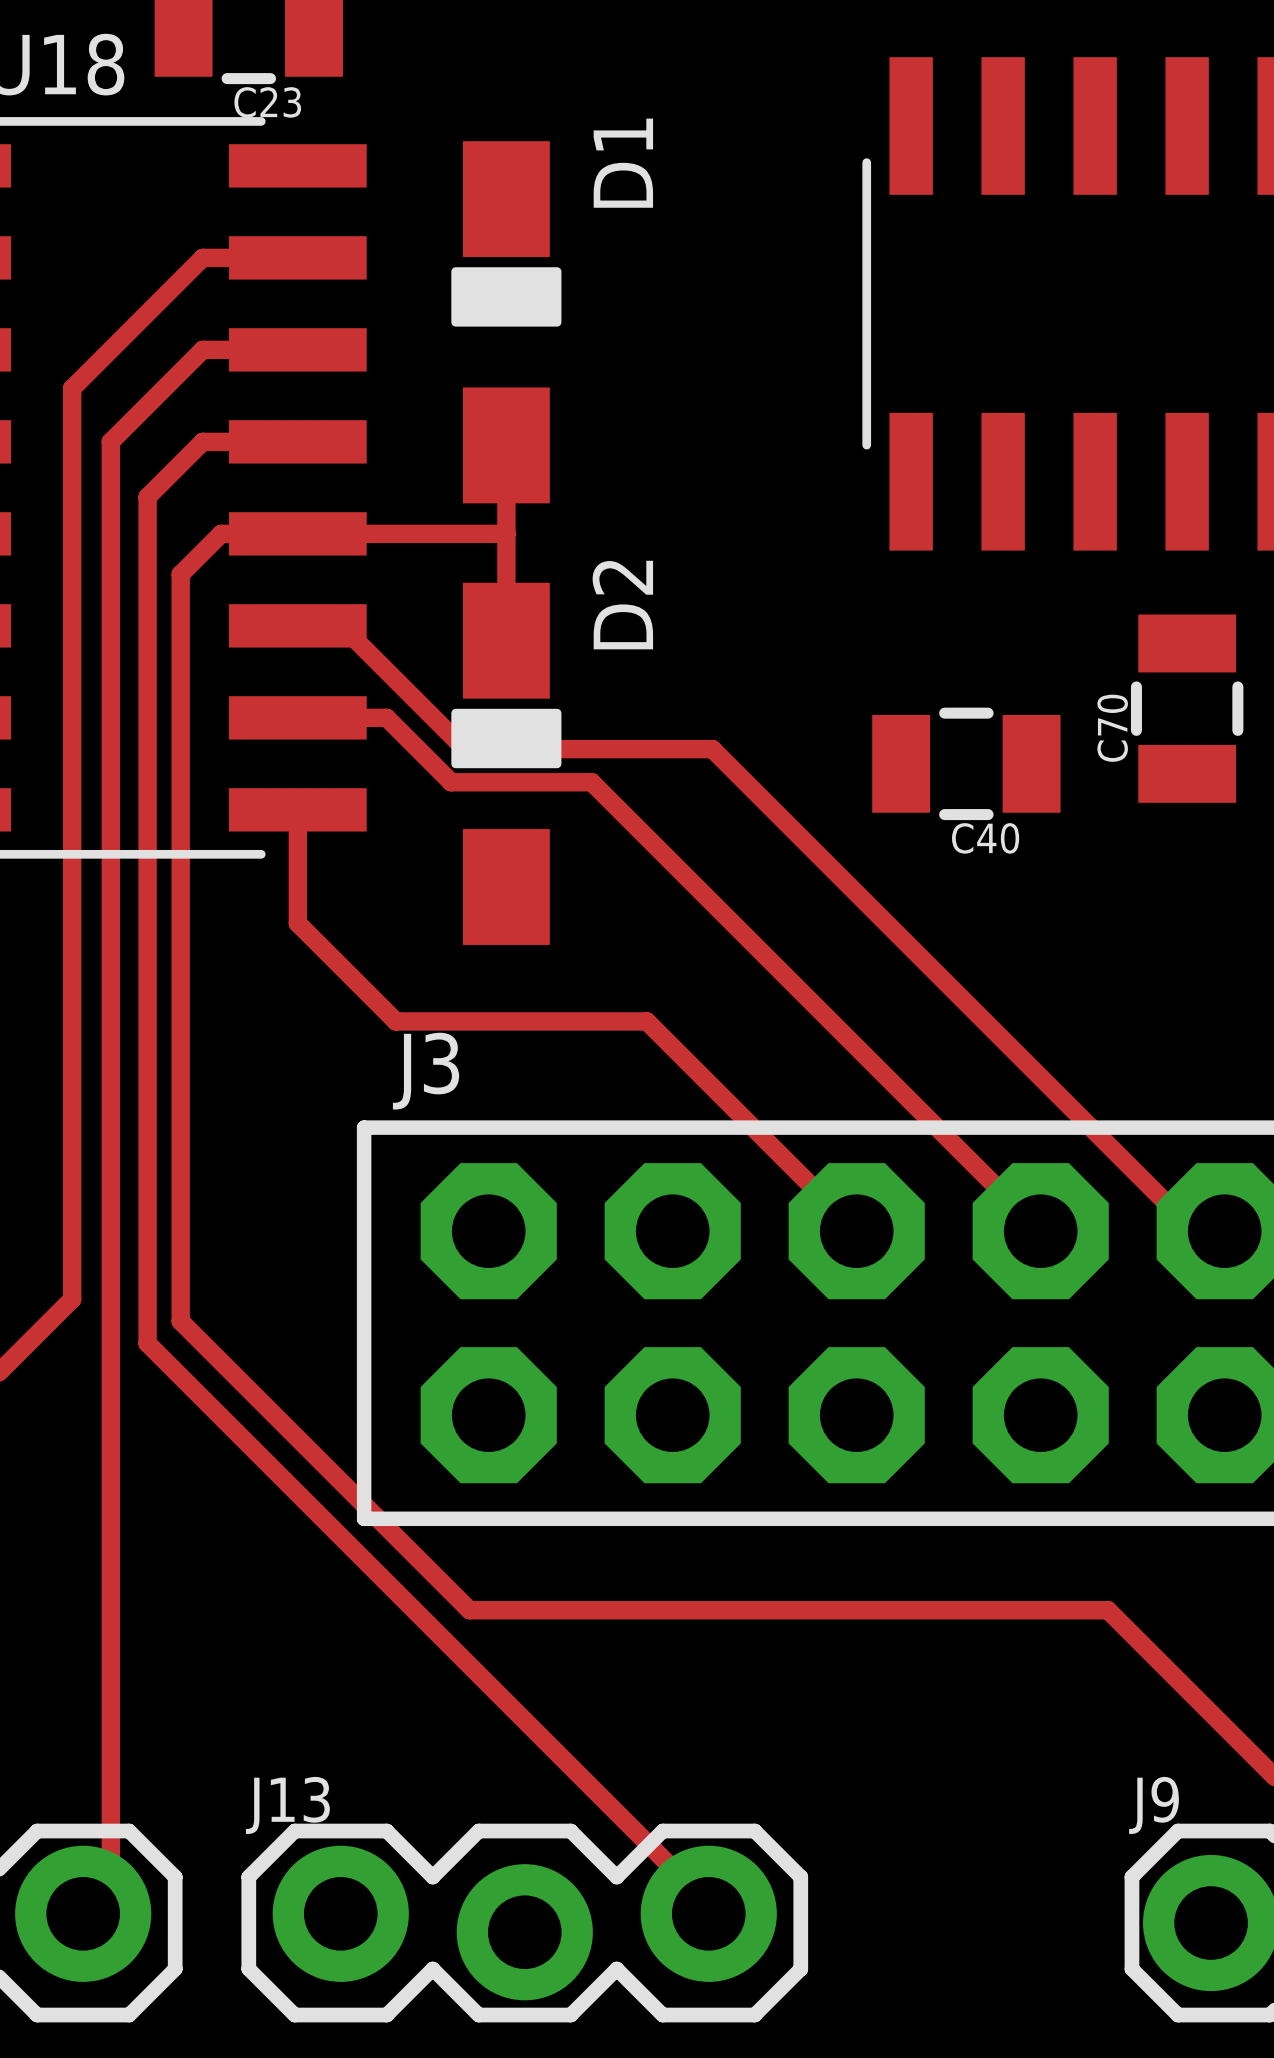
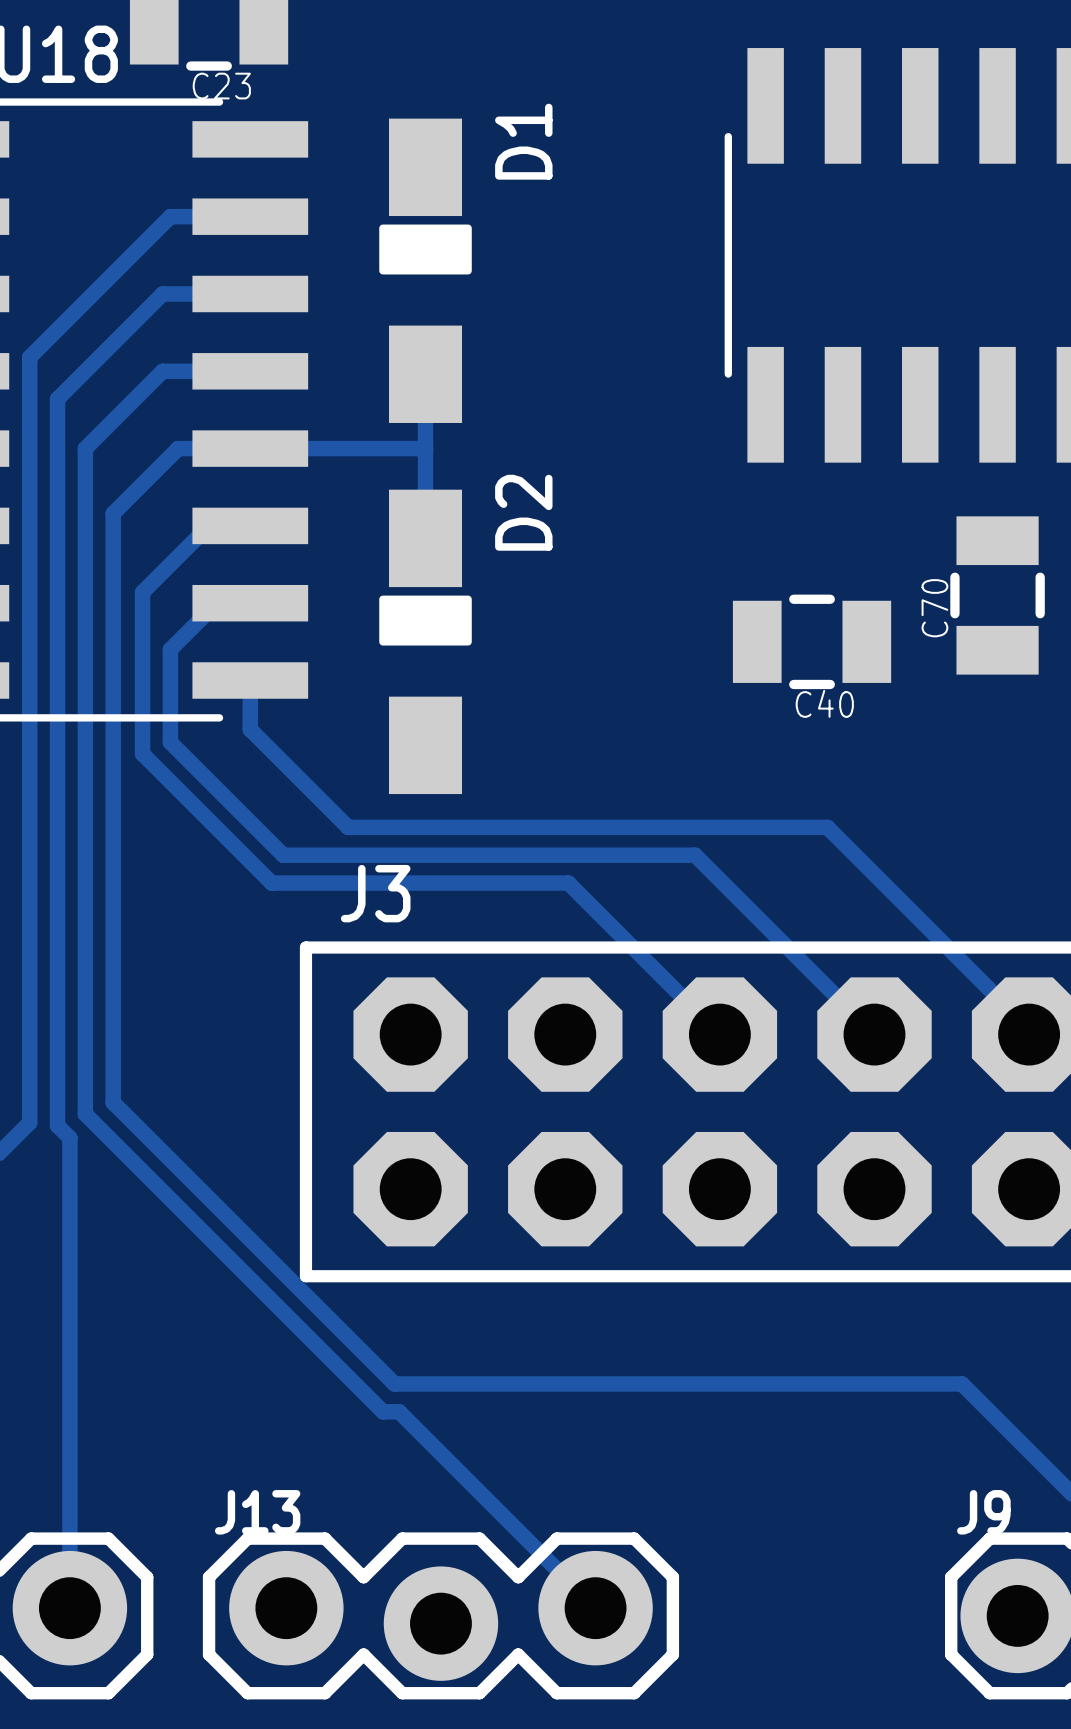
track: (202, 349) (110, 441) (110, 1886) (83, 1913) -> (170, 293) (162, 293) (57, 399) (57, 1125) (69, 1138) (69, 1608)
track: (72, 388) (72, 1299) (35, 1336) -> (60, 326) (29, 357) (29, 1122)
track: (202, 441) (147, 497) (147, 1343) (708, 1904) (708, 1913) -> (170, 371) (162, 371) (85, 448) (85, 1114) (383, 1411) (399, 1411) (595, 1608)
track: (221, 533) (180, 574) (180, 1321) (469, 1610) (1108, 1610) (1144, 1647) -> (185, 448) (178, 448) (113, 513) (113, 1102) (394, 1383) (962, 1383)
track: (297, 625) (341, 625) (464, 749) (712, 749) (1194, 1231) (1224, 1231) -> (250, 729) (348, 827) (827, 827) (1029, 1029) (1029, 1034)
track: (297, 717) (386, 717) (451, 782) (591, 782) (827, 1017) -> (209, 610) (170, 649) (170, 742) (283, 855) (695, 855)
track: (297, 868) (297, 923) (395, 1021) (646, 1021) (676, 1050) -> (250, 525) (209, 525) (142, 592) (142, 753) (271, 883) (568, 883)

